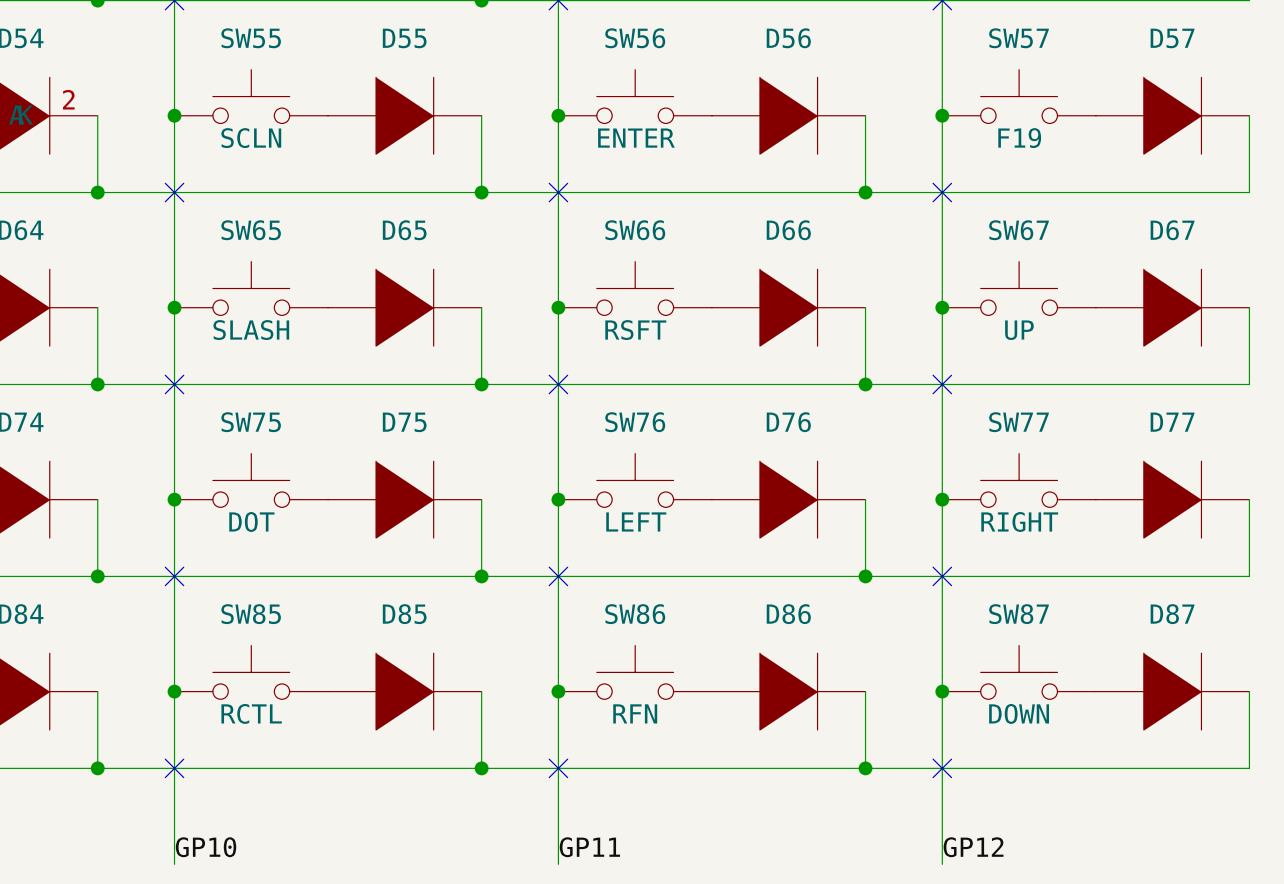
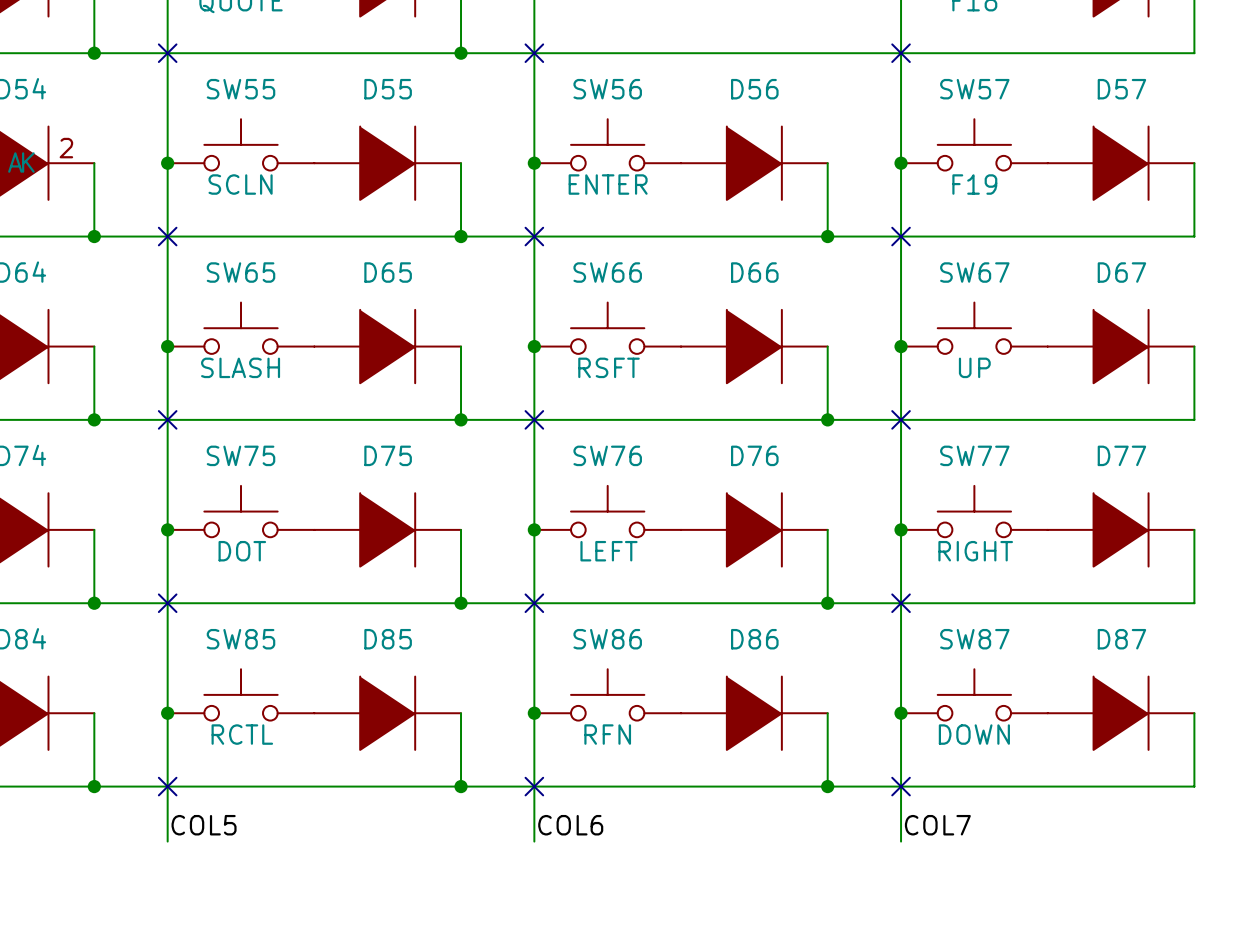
label: none -> COL5 (204, 825)
label: none -> COL6 (570, 825)
label: none -> COL7 (937, 825)
wire: (174, 825) (174, 864) -> none
wire: (558, 825) (558, 864) -> none
wire: (942, 825) (942, 864) -> none
label: GP10 (206, 847) -> none
label: GP11 (589, 847) -> none
label: GP12 (973, 847) -> none

